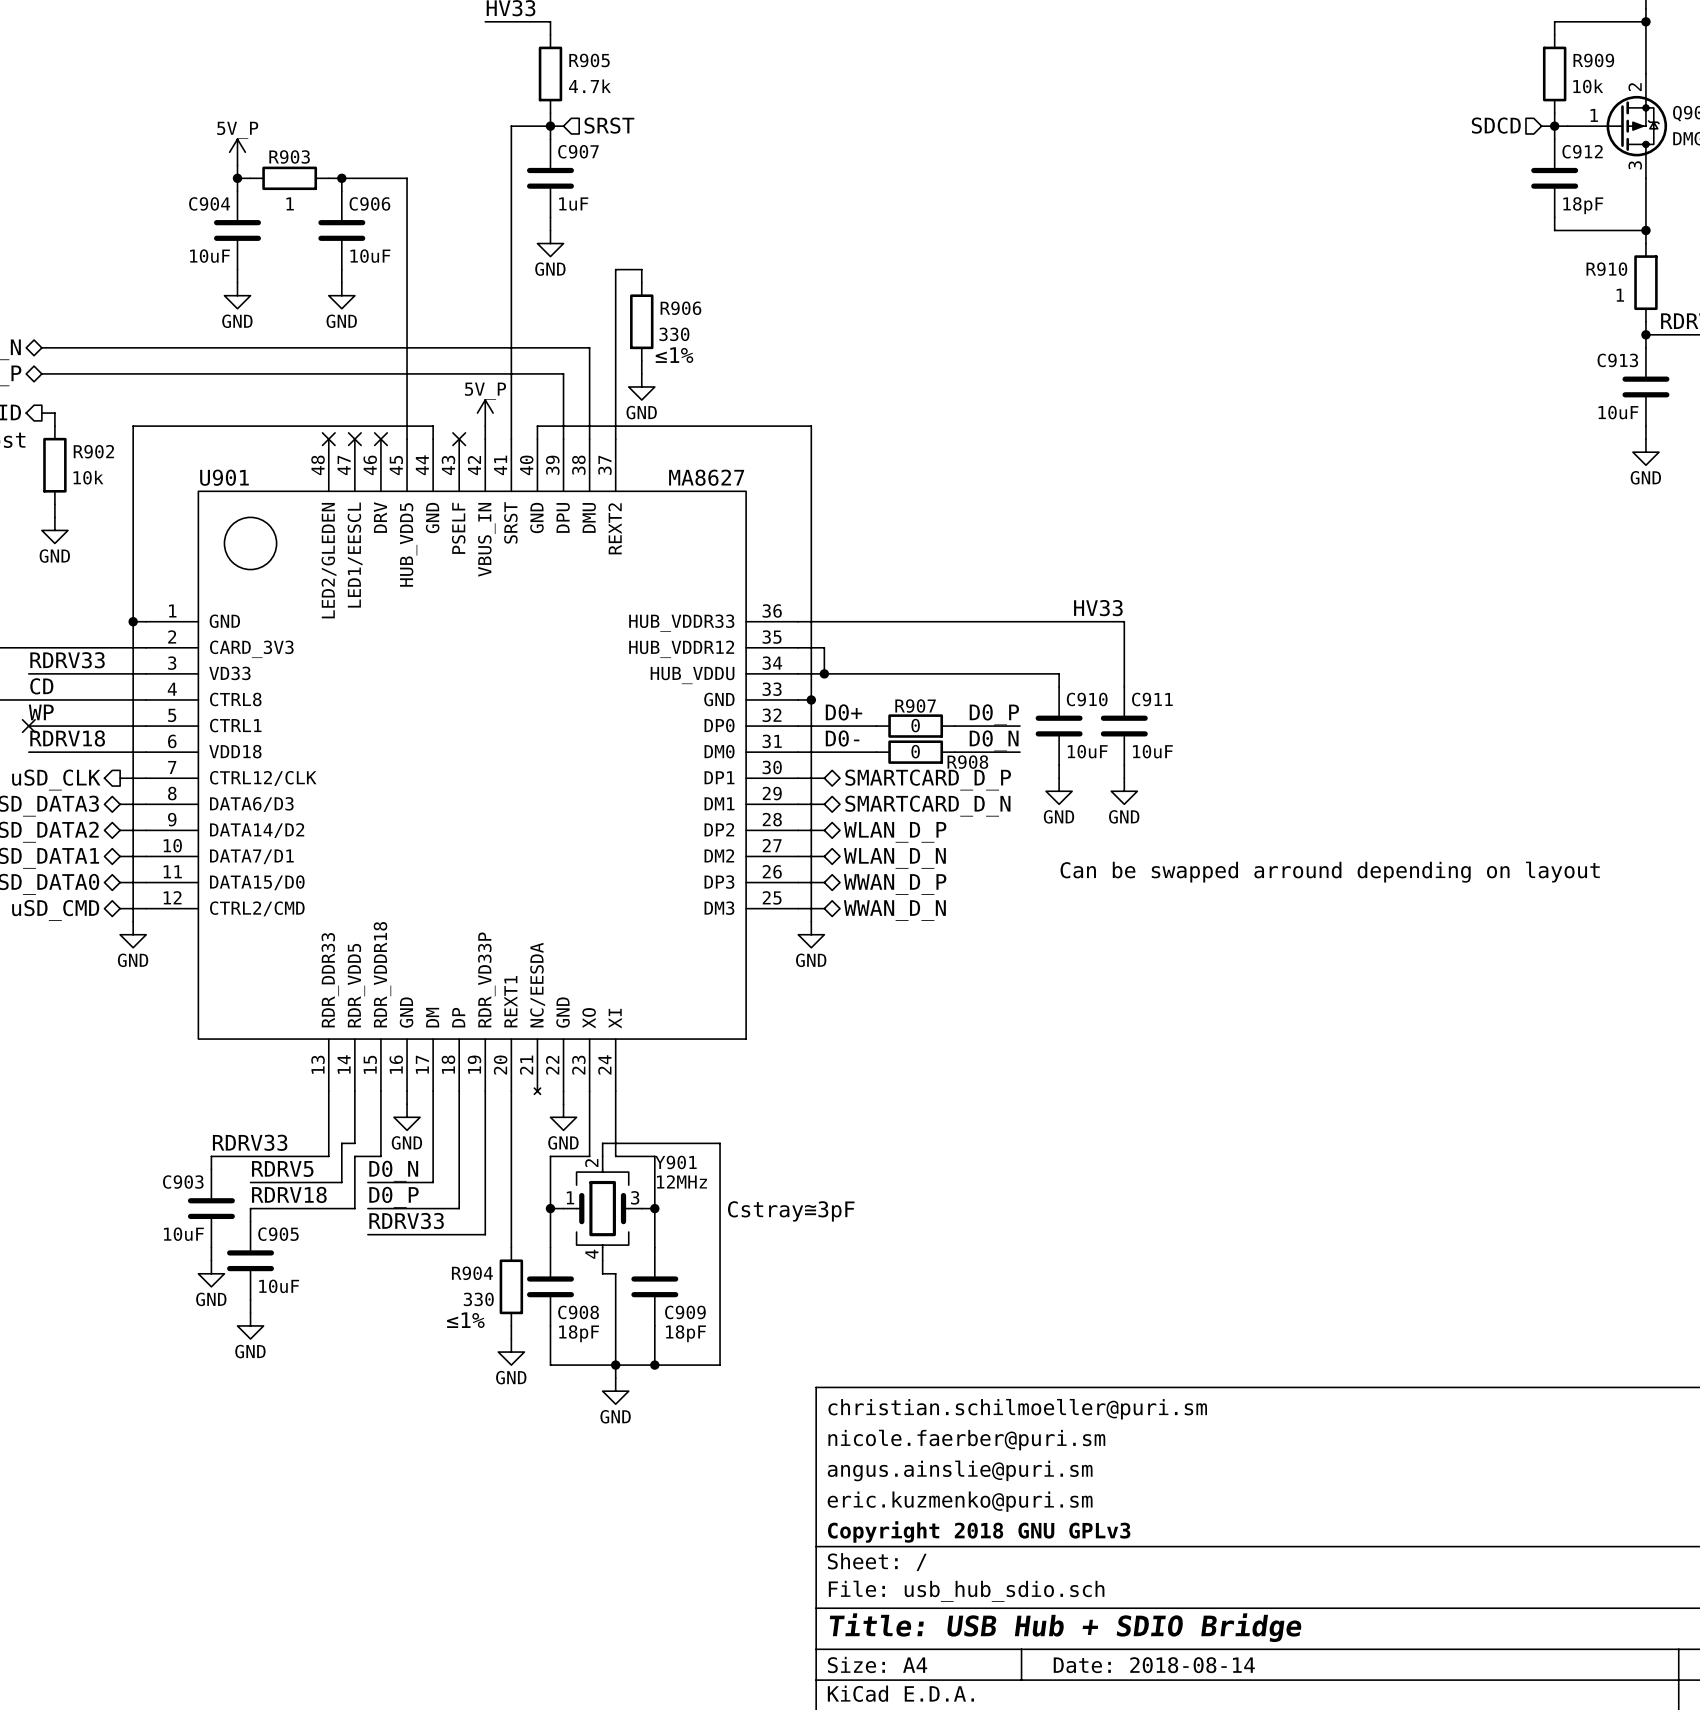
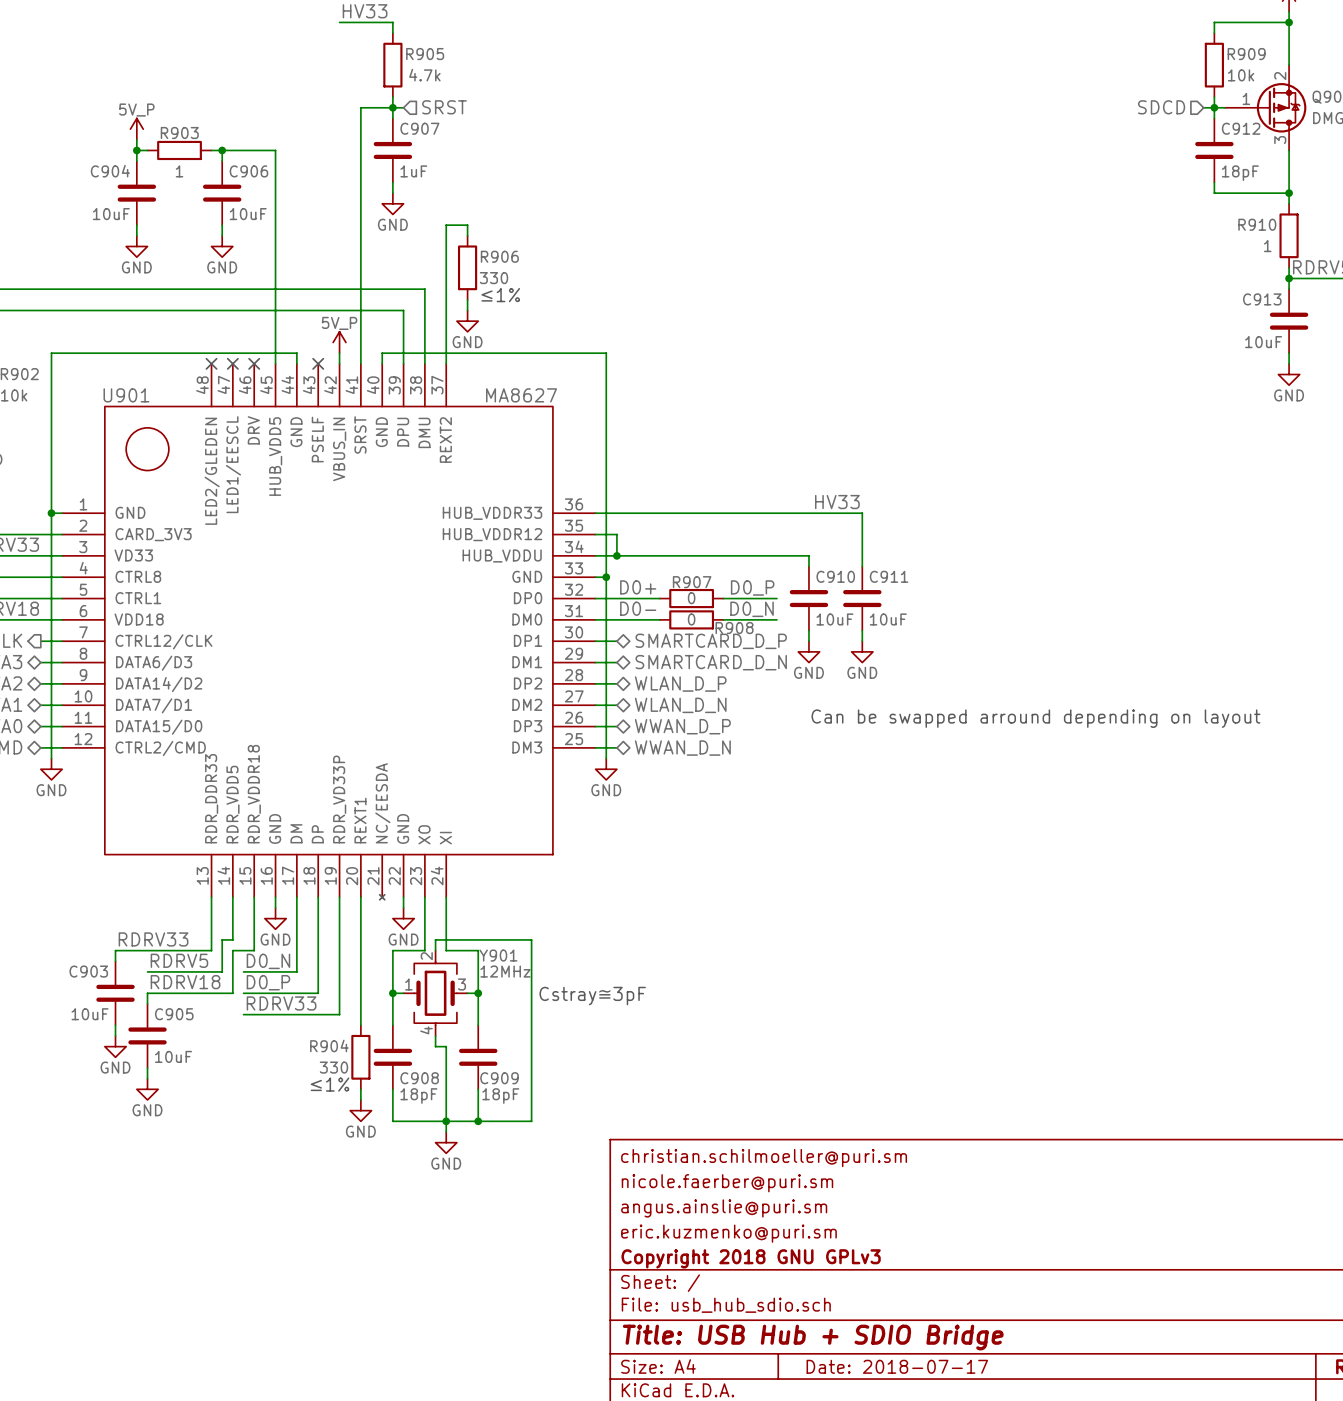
title block: Date: 2018-08-14 (1154, 1665) -> Date: 2018-07-17 (897, 1366)

